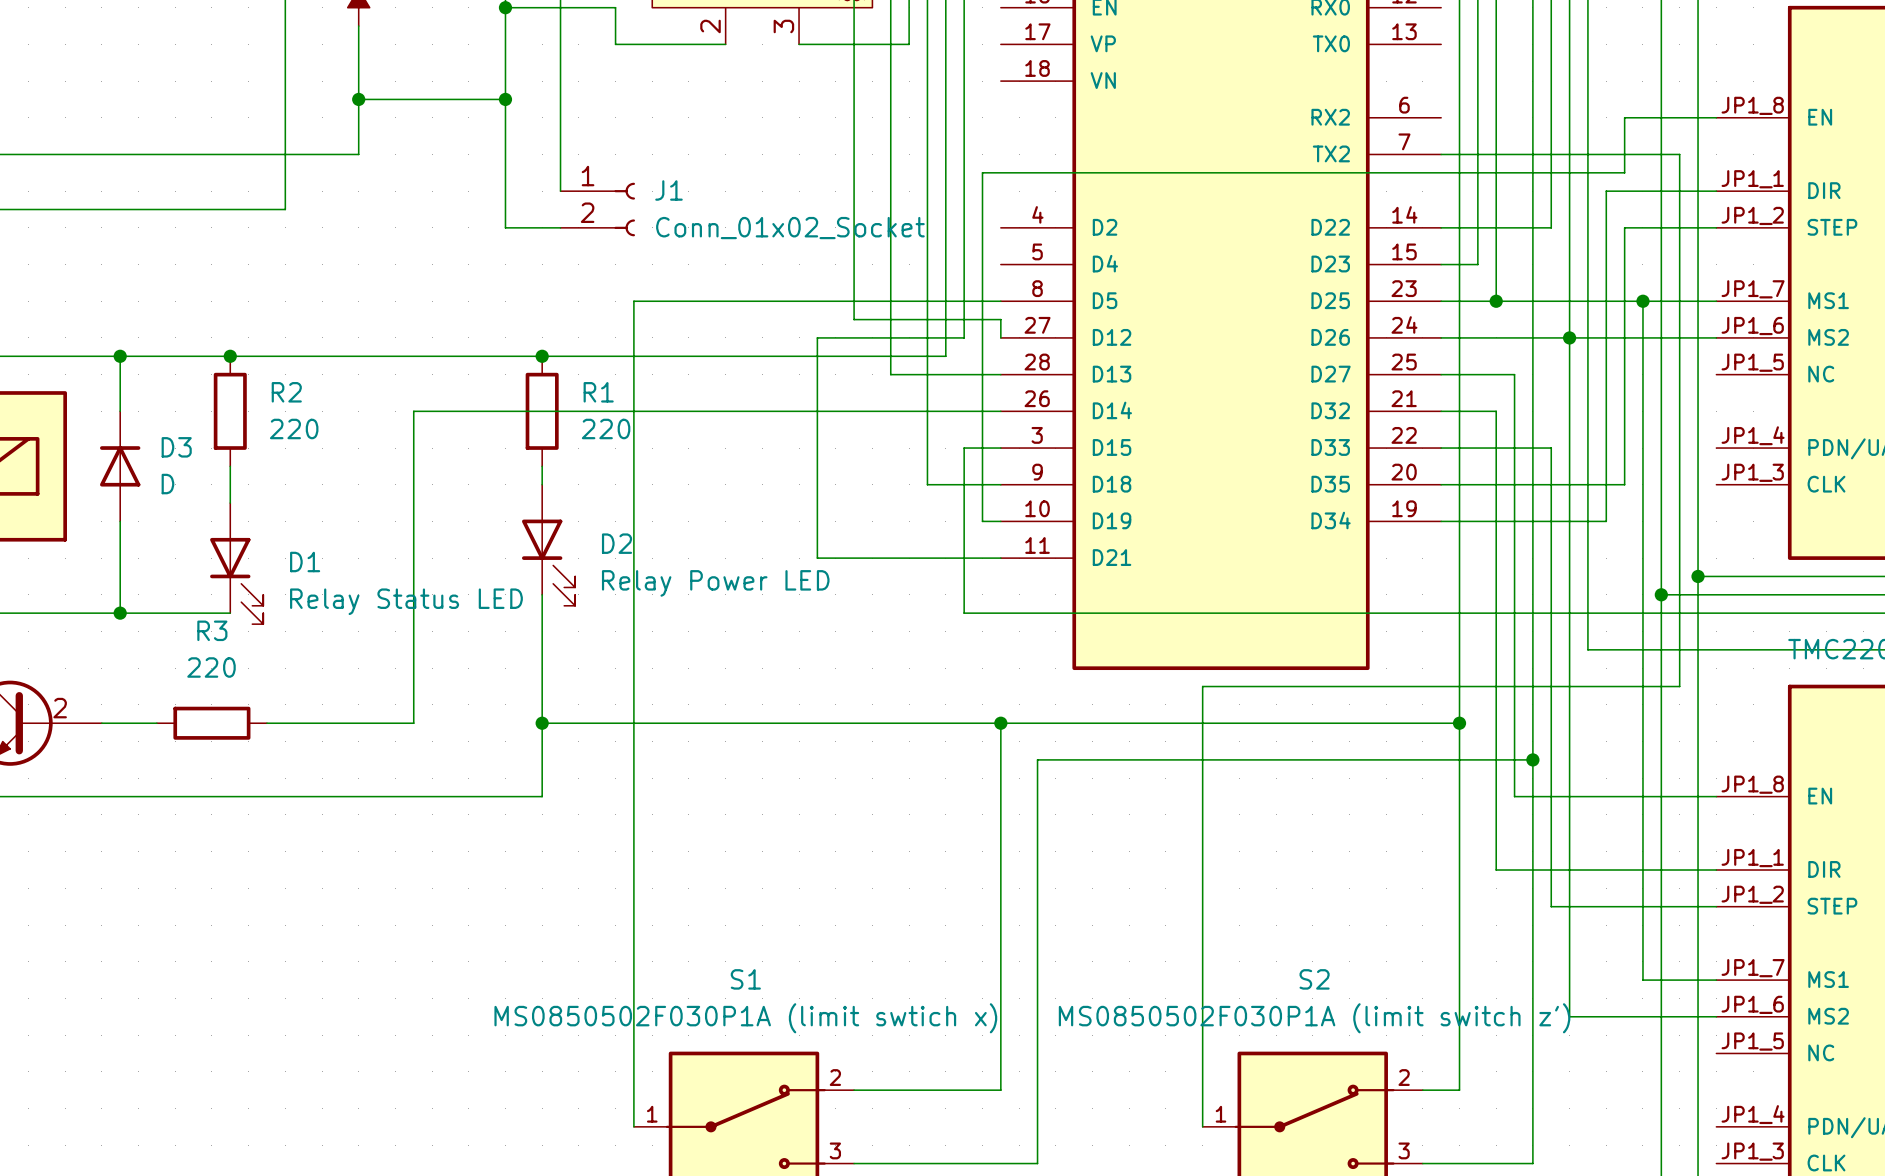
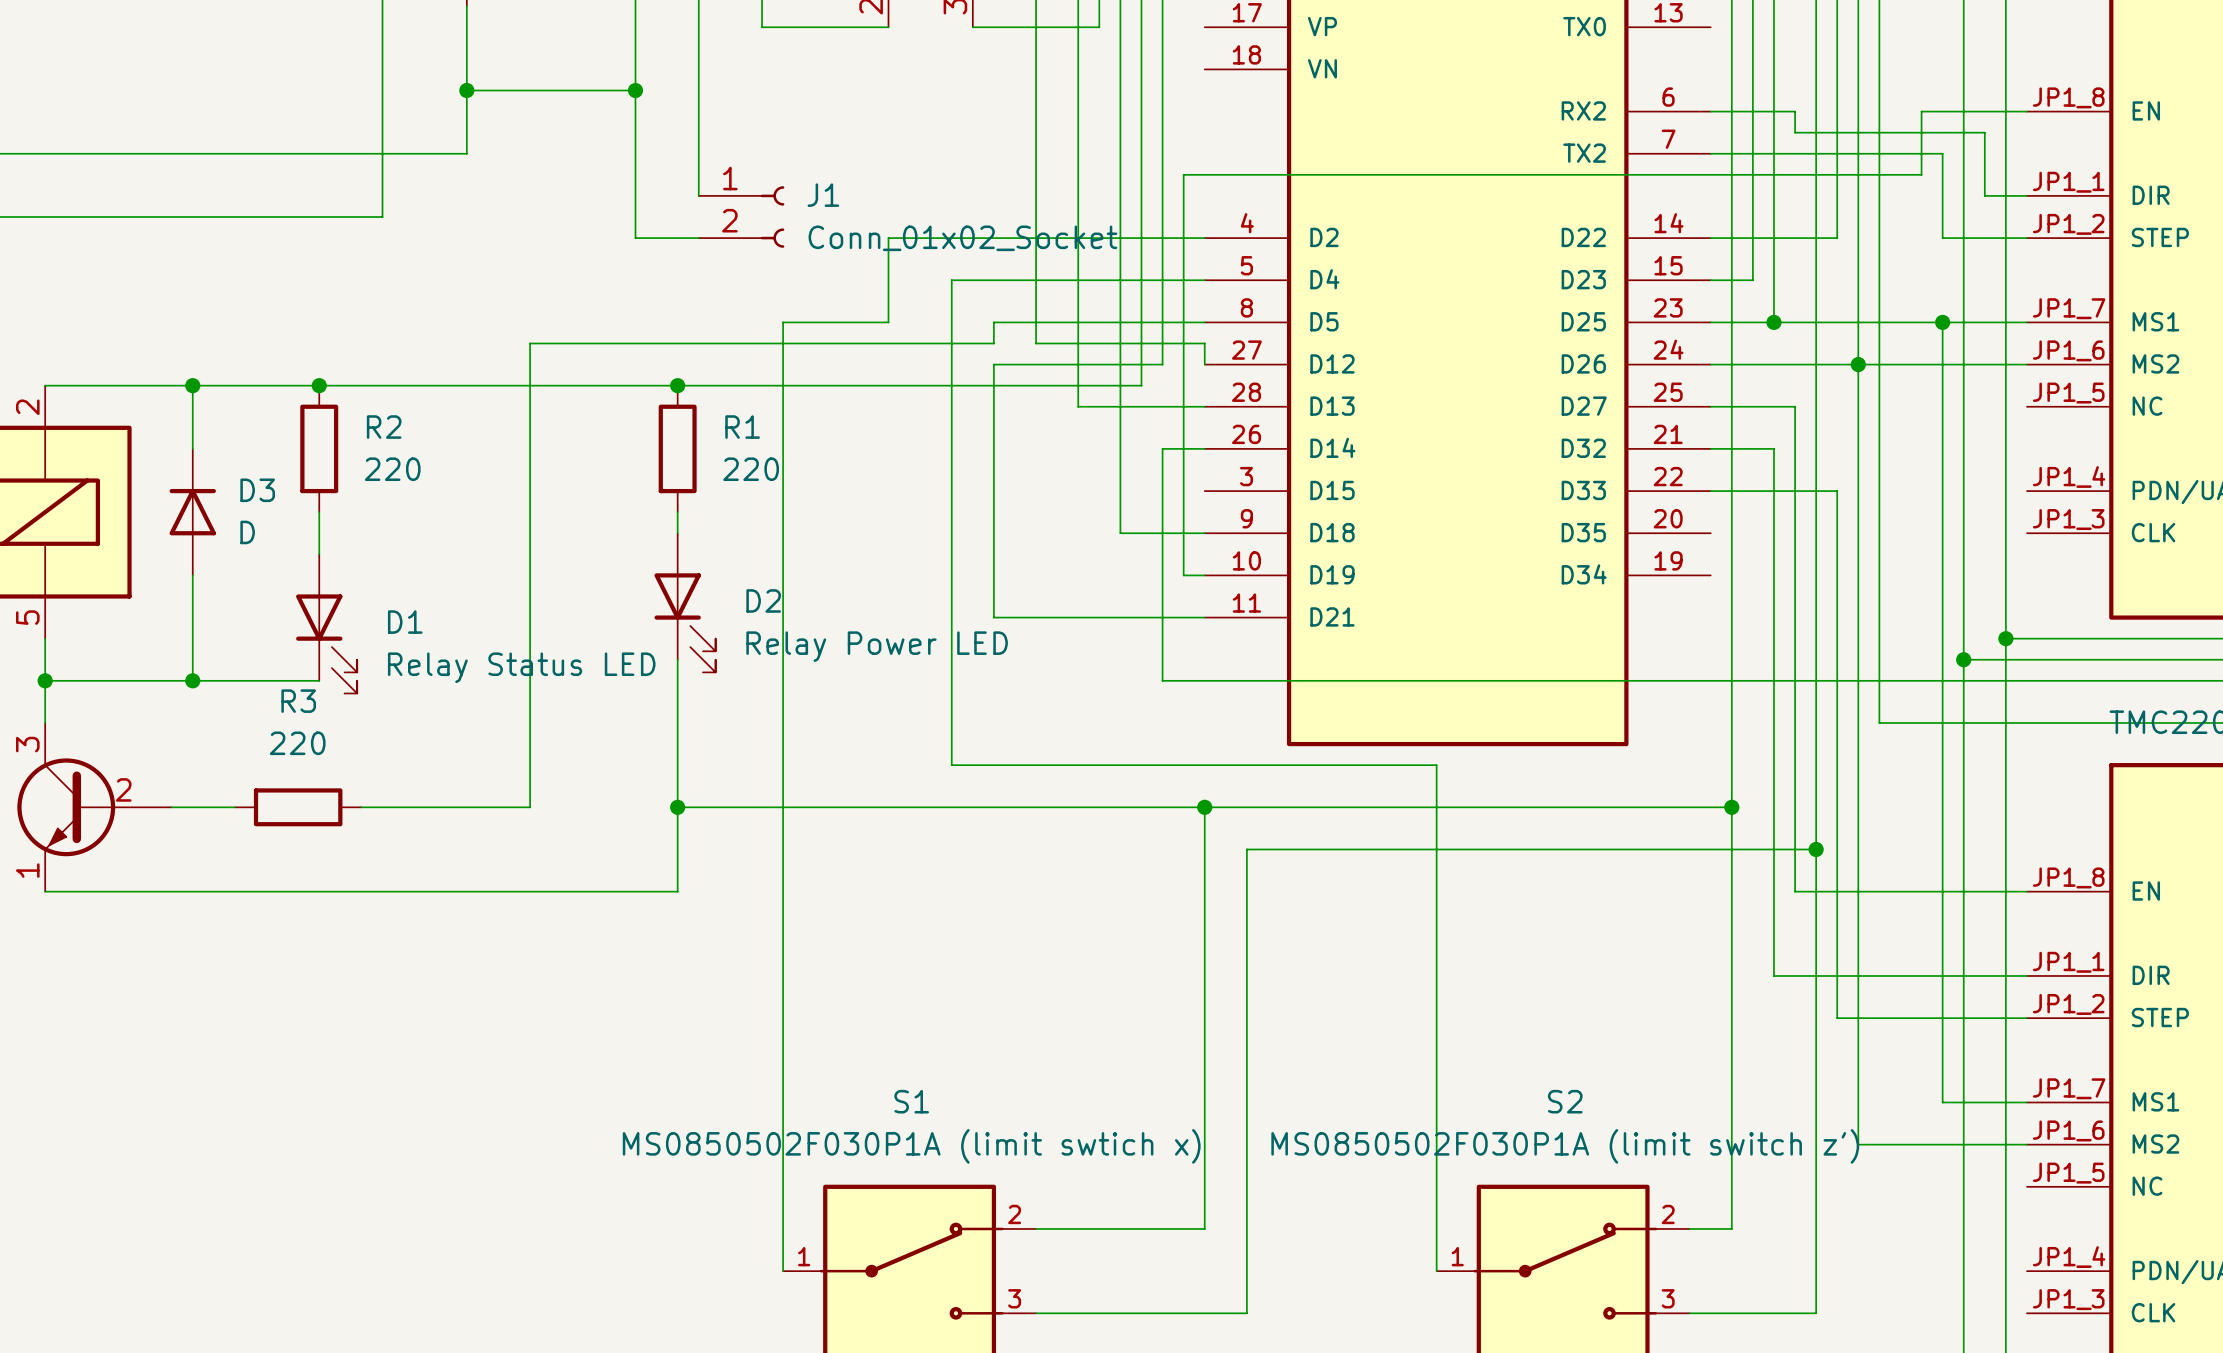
wire: none -> (1710, 111) (1795, 111) (1795, 132) (1984, 132) (1984, 153)
wire: (1642, 154) (1679, 154) -> (1942, 153) (1942, 238)
wire: (1642, 227) (1624, 227) (1624, 484) (1441, 484) -> none
wire: (725, 301) (817, 301) -> (888, 322) (888, 238) (1204, 238)
wire: (413, 411) (964, 411) -> (530, 448) (530, 343) (993, 343) (993, 322)
wire: (964, 448) (1000, 448) -> (1162, 491) (1162, 448)
wire: (1441, 521) (1606, 521) (1606, 191) (1679, 191) (1679, 686) (1202, 686) -> (1204, 280) (951, 280) (951, 765) (1436, 765)

